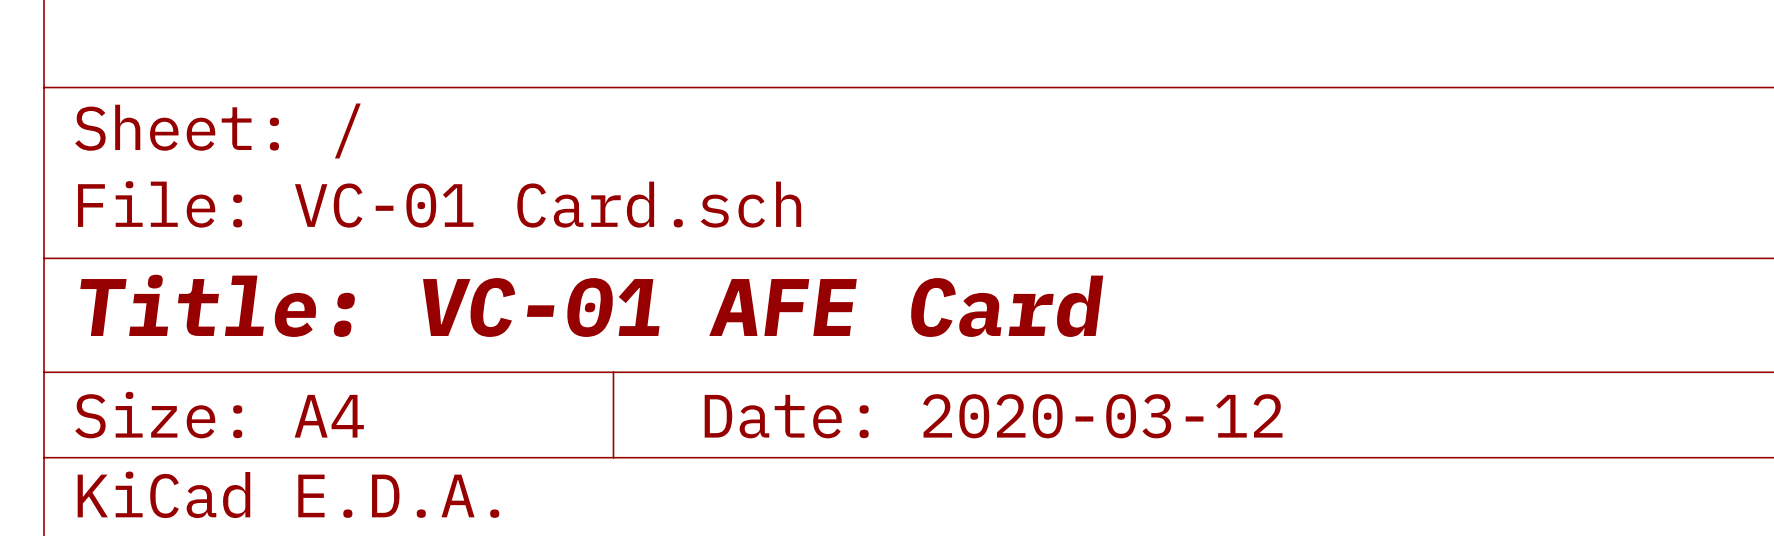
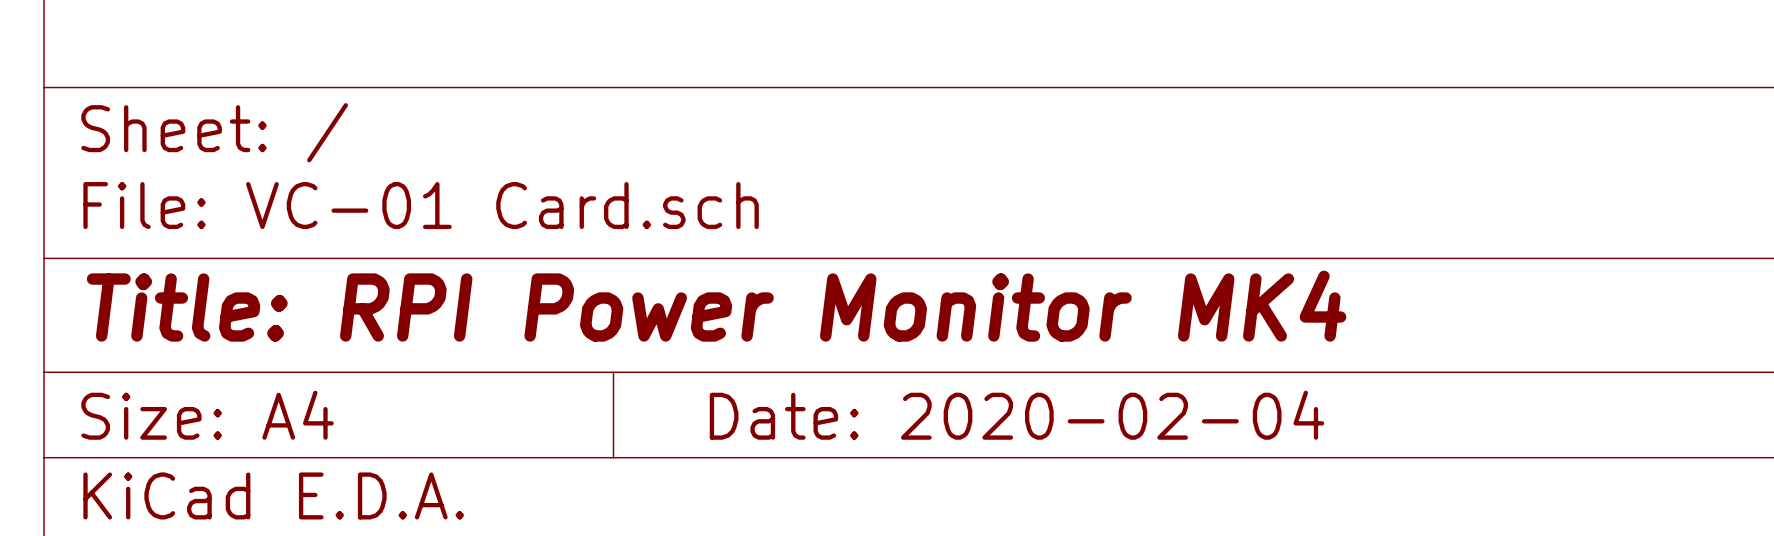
title block: Title: VC-01 AFE Card (591, 305) -> Title: RPI Power Monitor MK4 (716, 306)
title block: Date: 2020-03-12 (993, 416) -> Date: 2020-02-04 (1017, 415)

